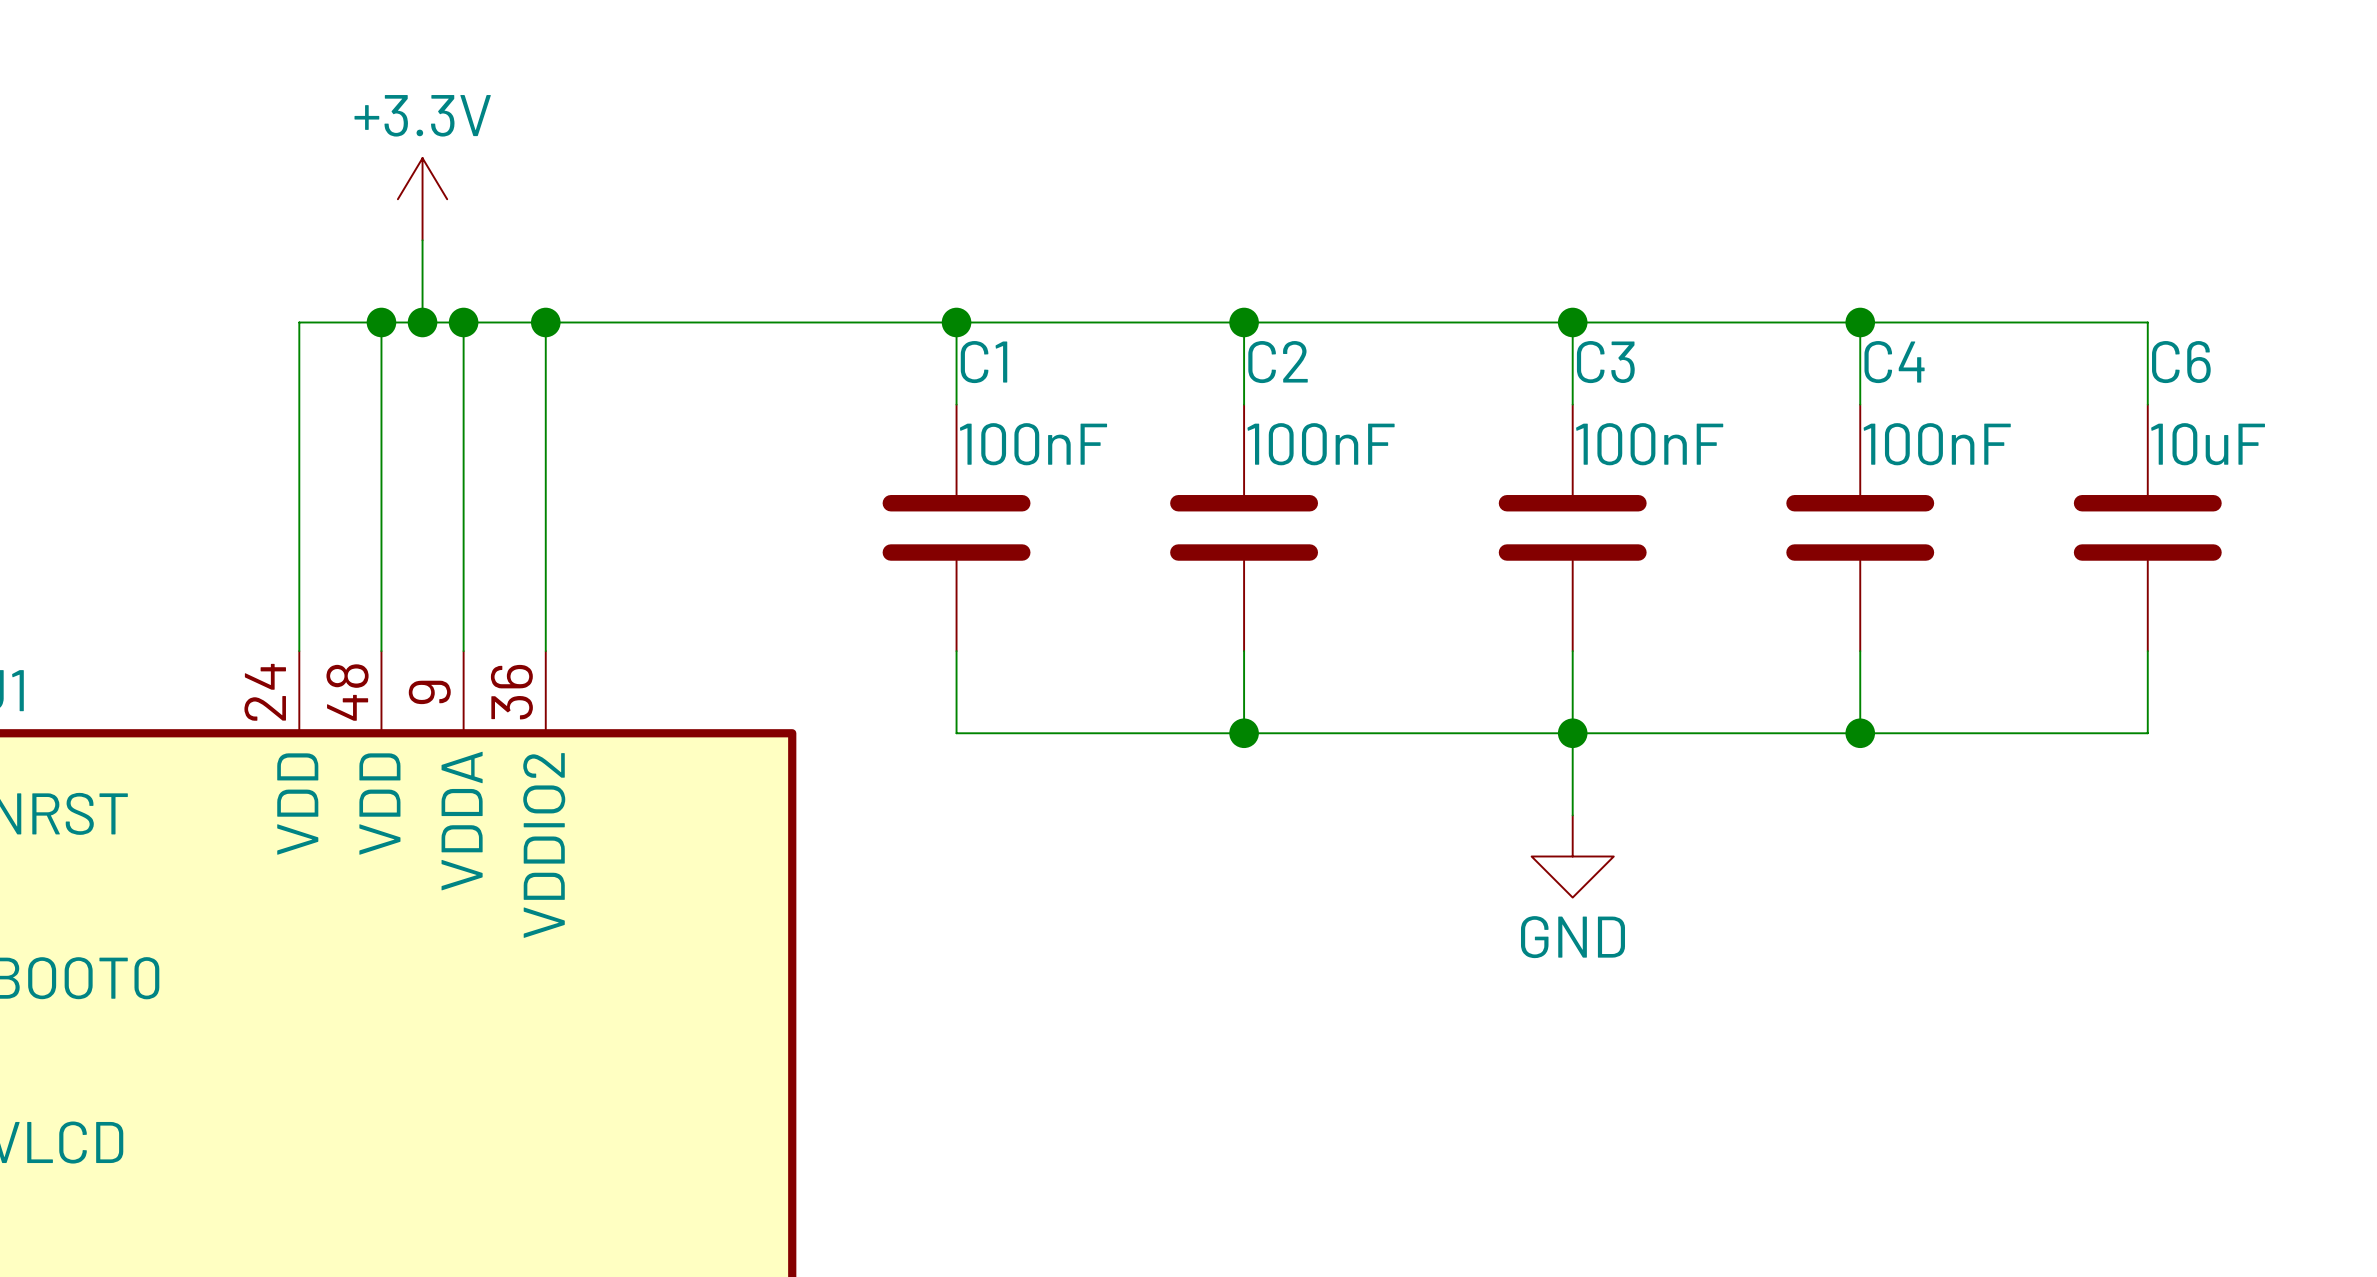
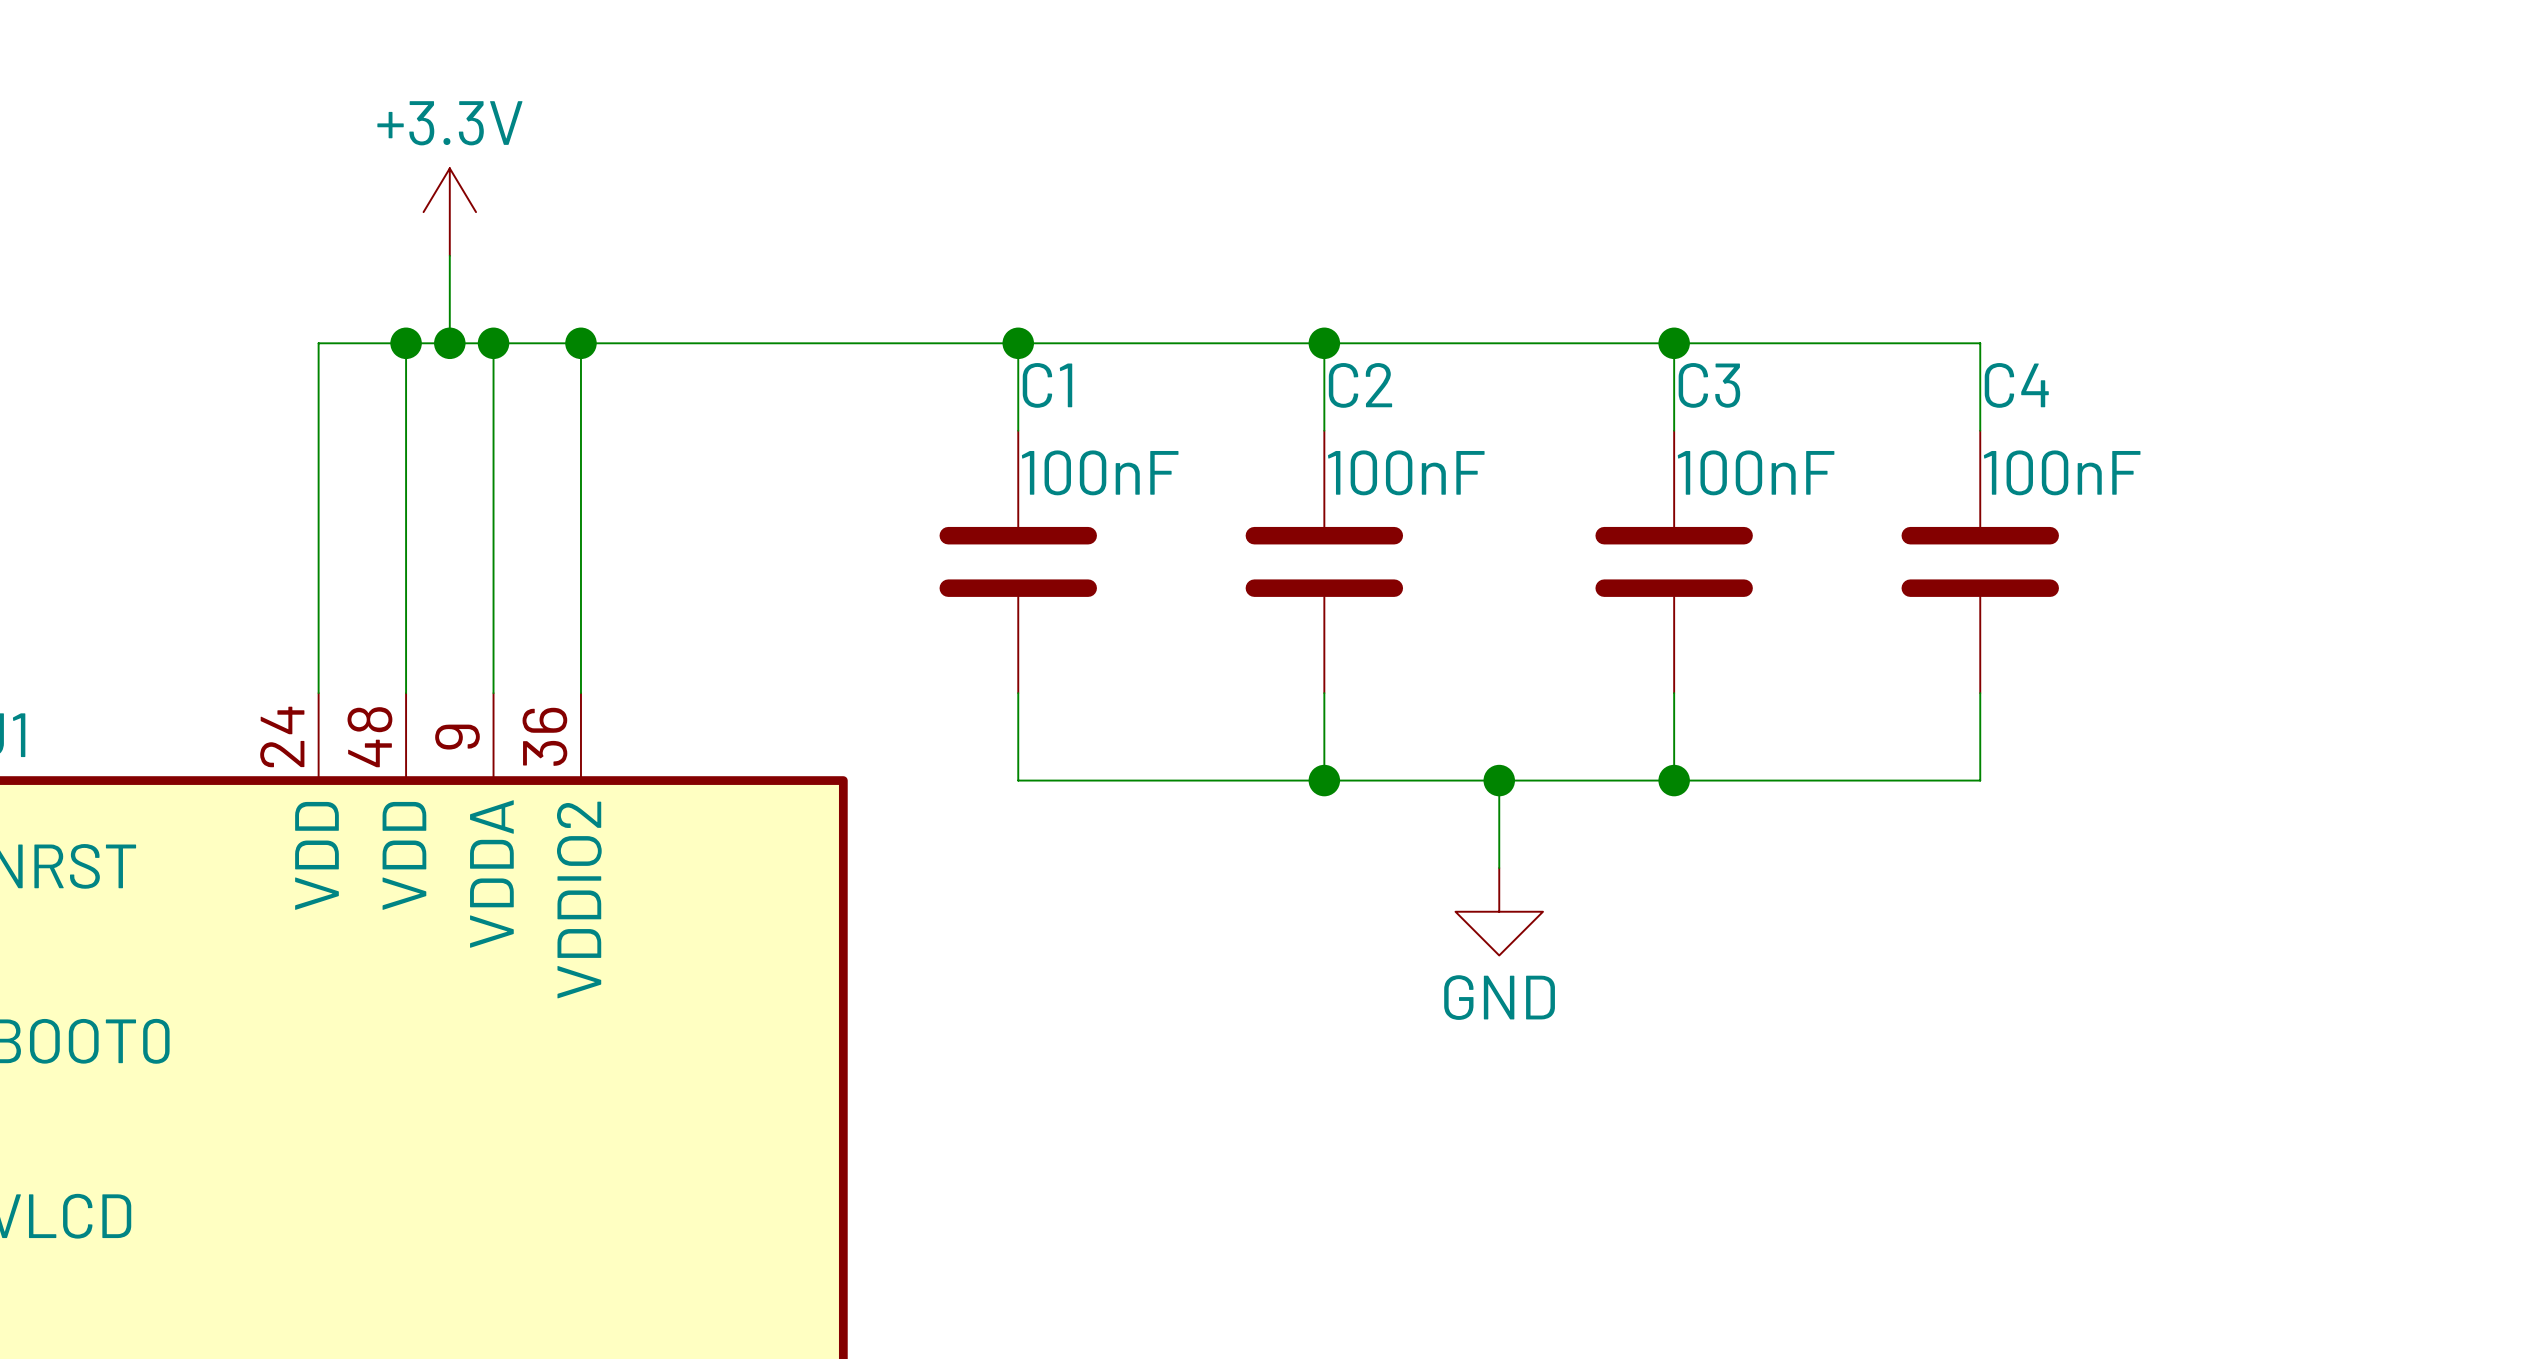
wire: (1860, 322) (2147, 322) (2147, 404) -> none
junction: (1860, 322) -> none
C6: 10uF (2147, 527) -> none
wire: (2147, 651) (2147, 733) (1860, 733) -> none
junction: none -> (1499, 780)
wire: (1572, 733) (1572, 815) -> (1499, 780) (1499, 868)
junction: (1860, 733) -> none
power symbol position: GND (1572, 856) -> GND (1499, 911)

